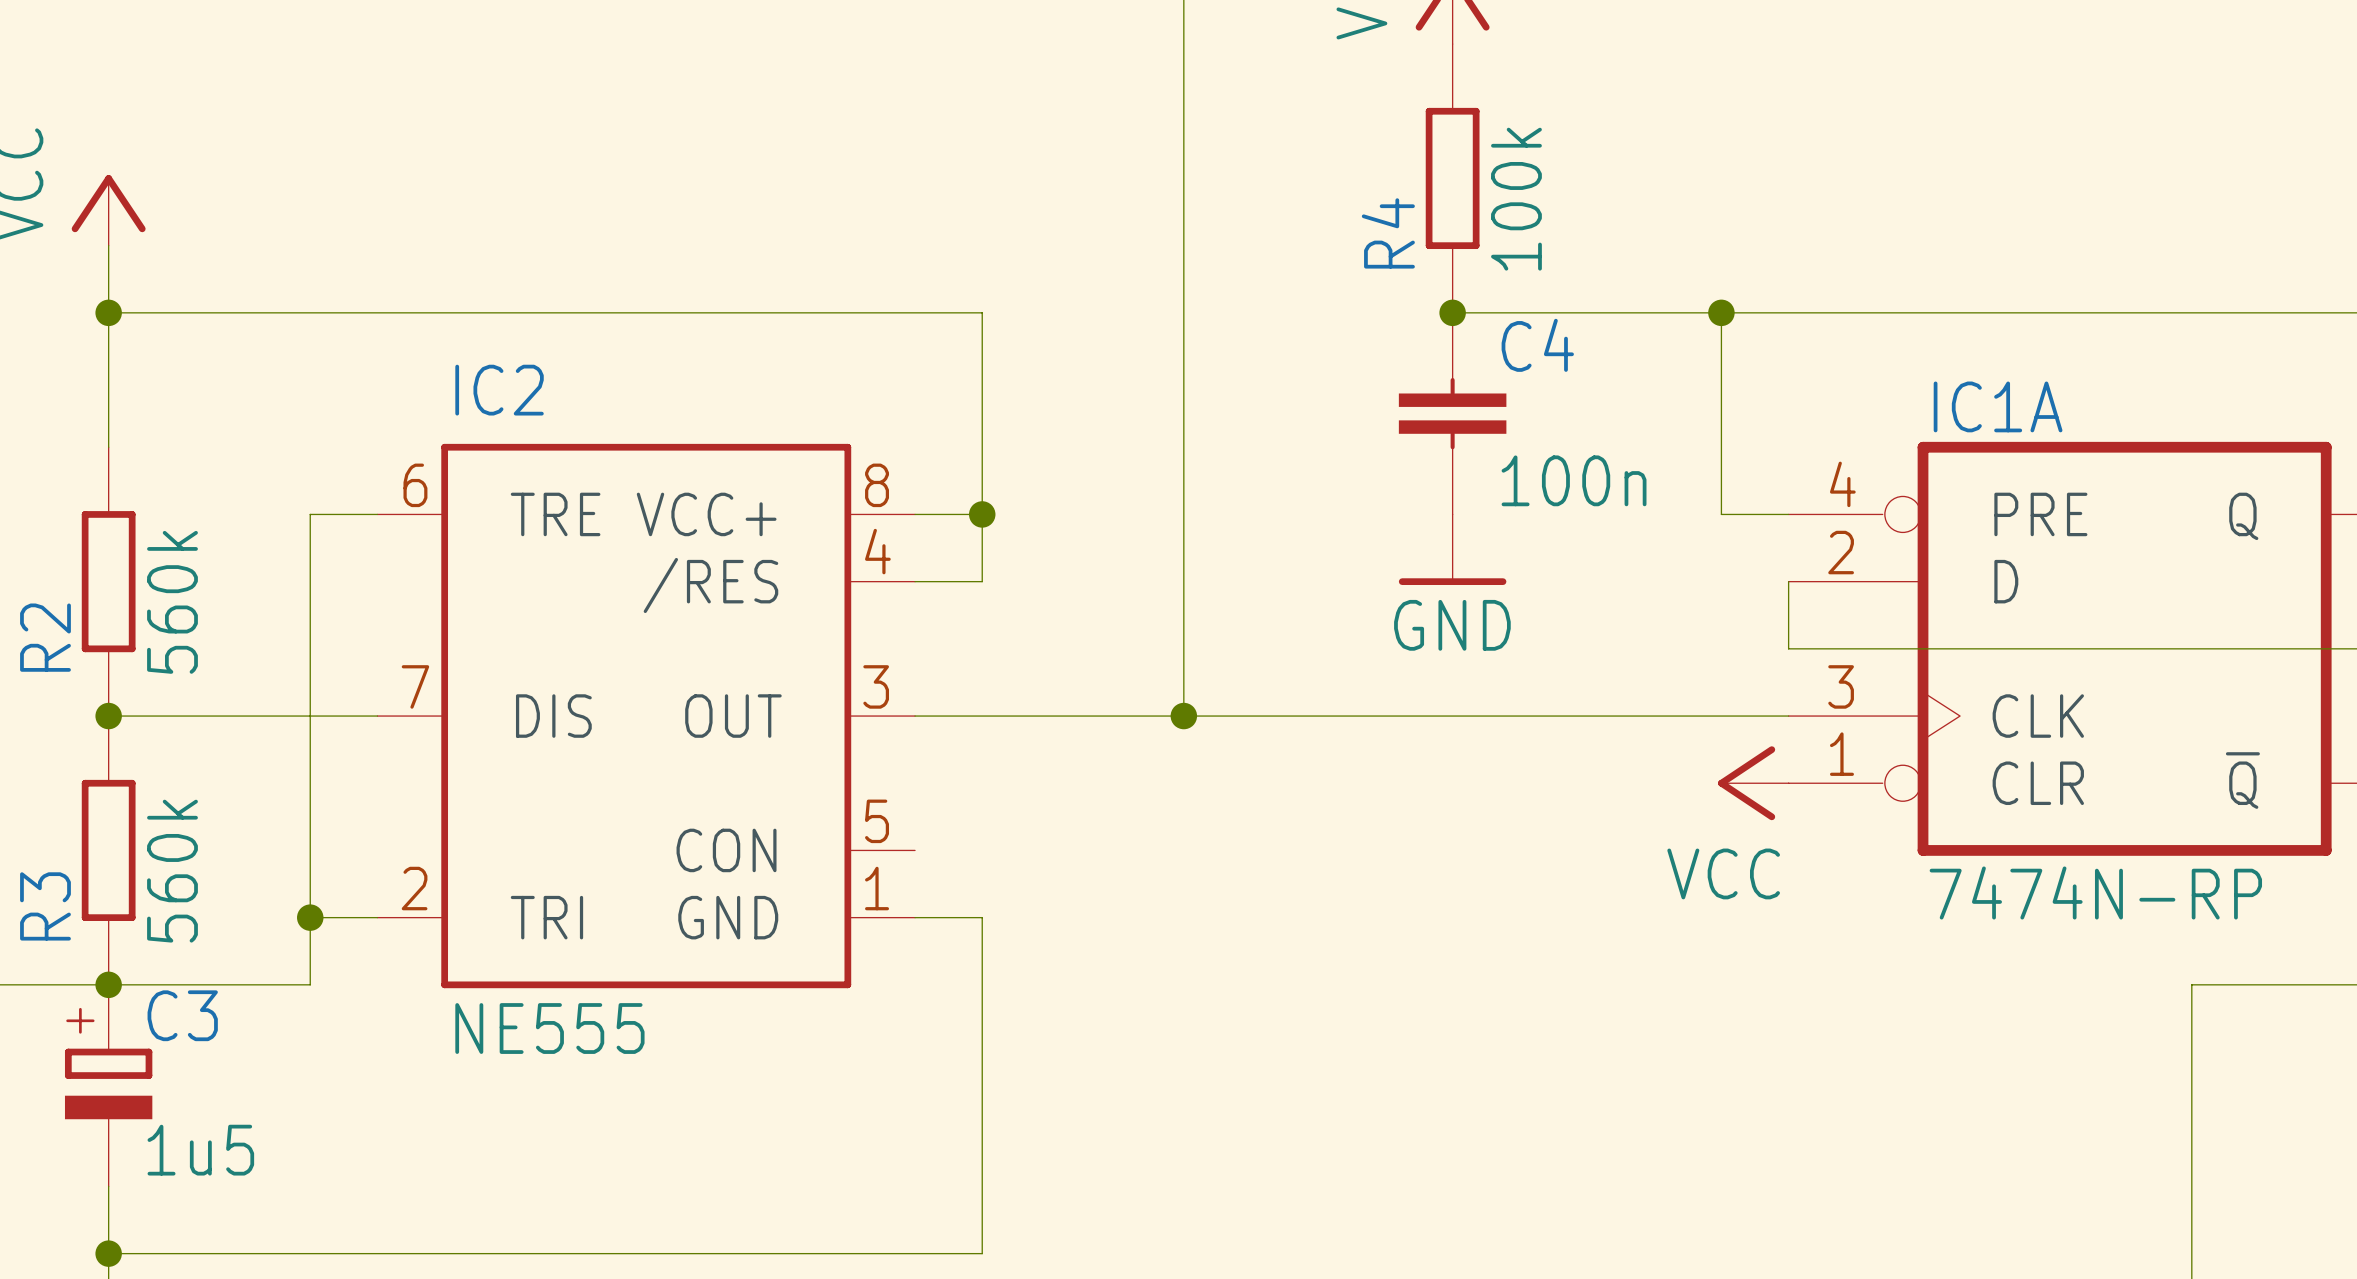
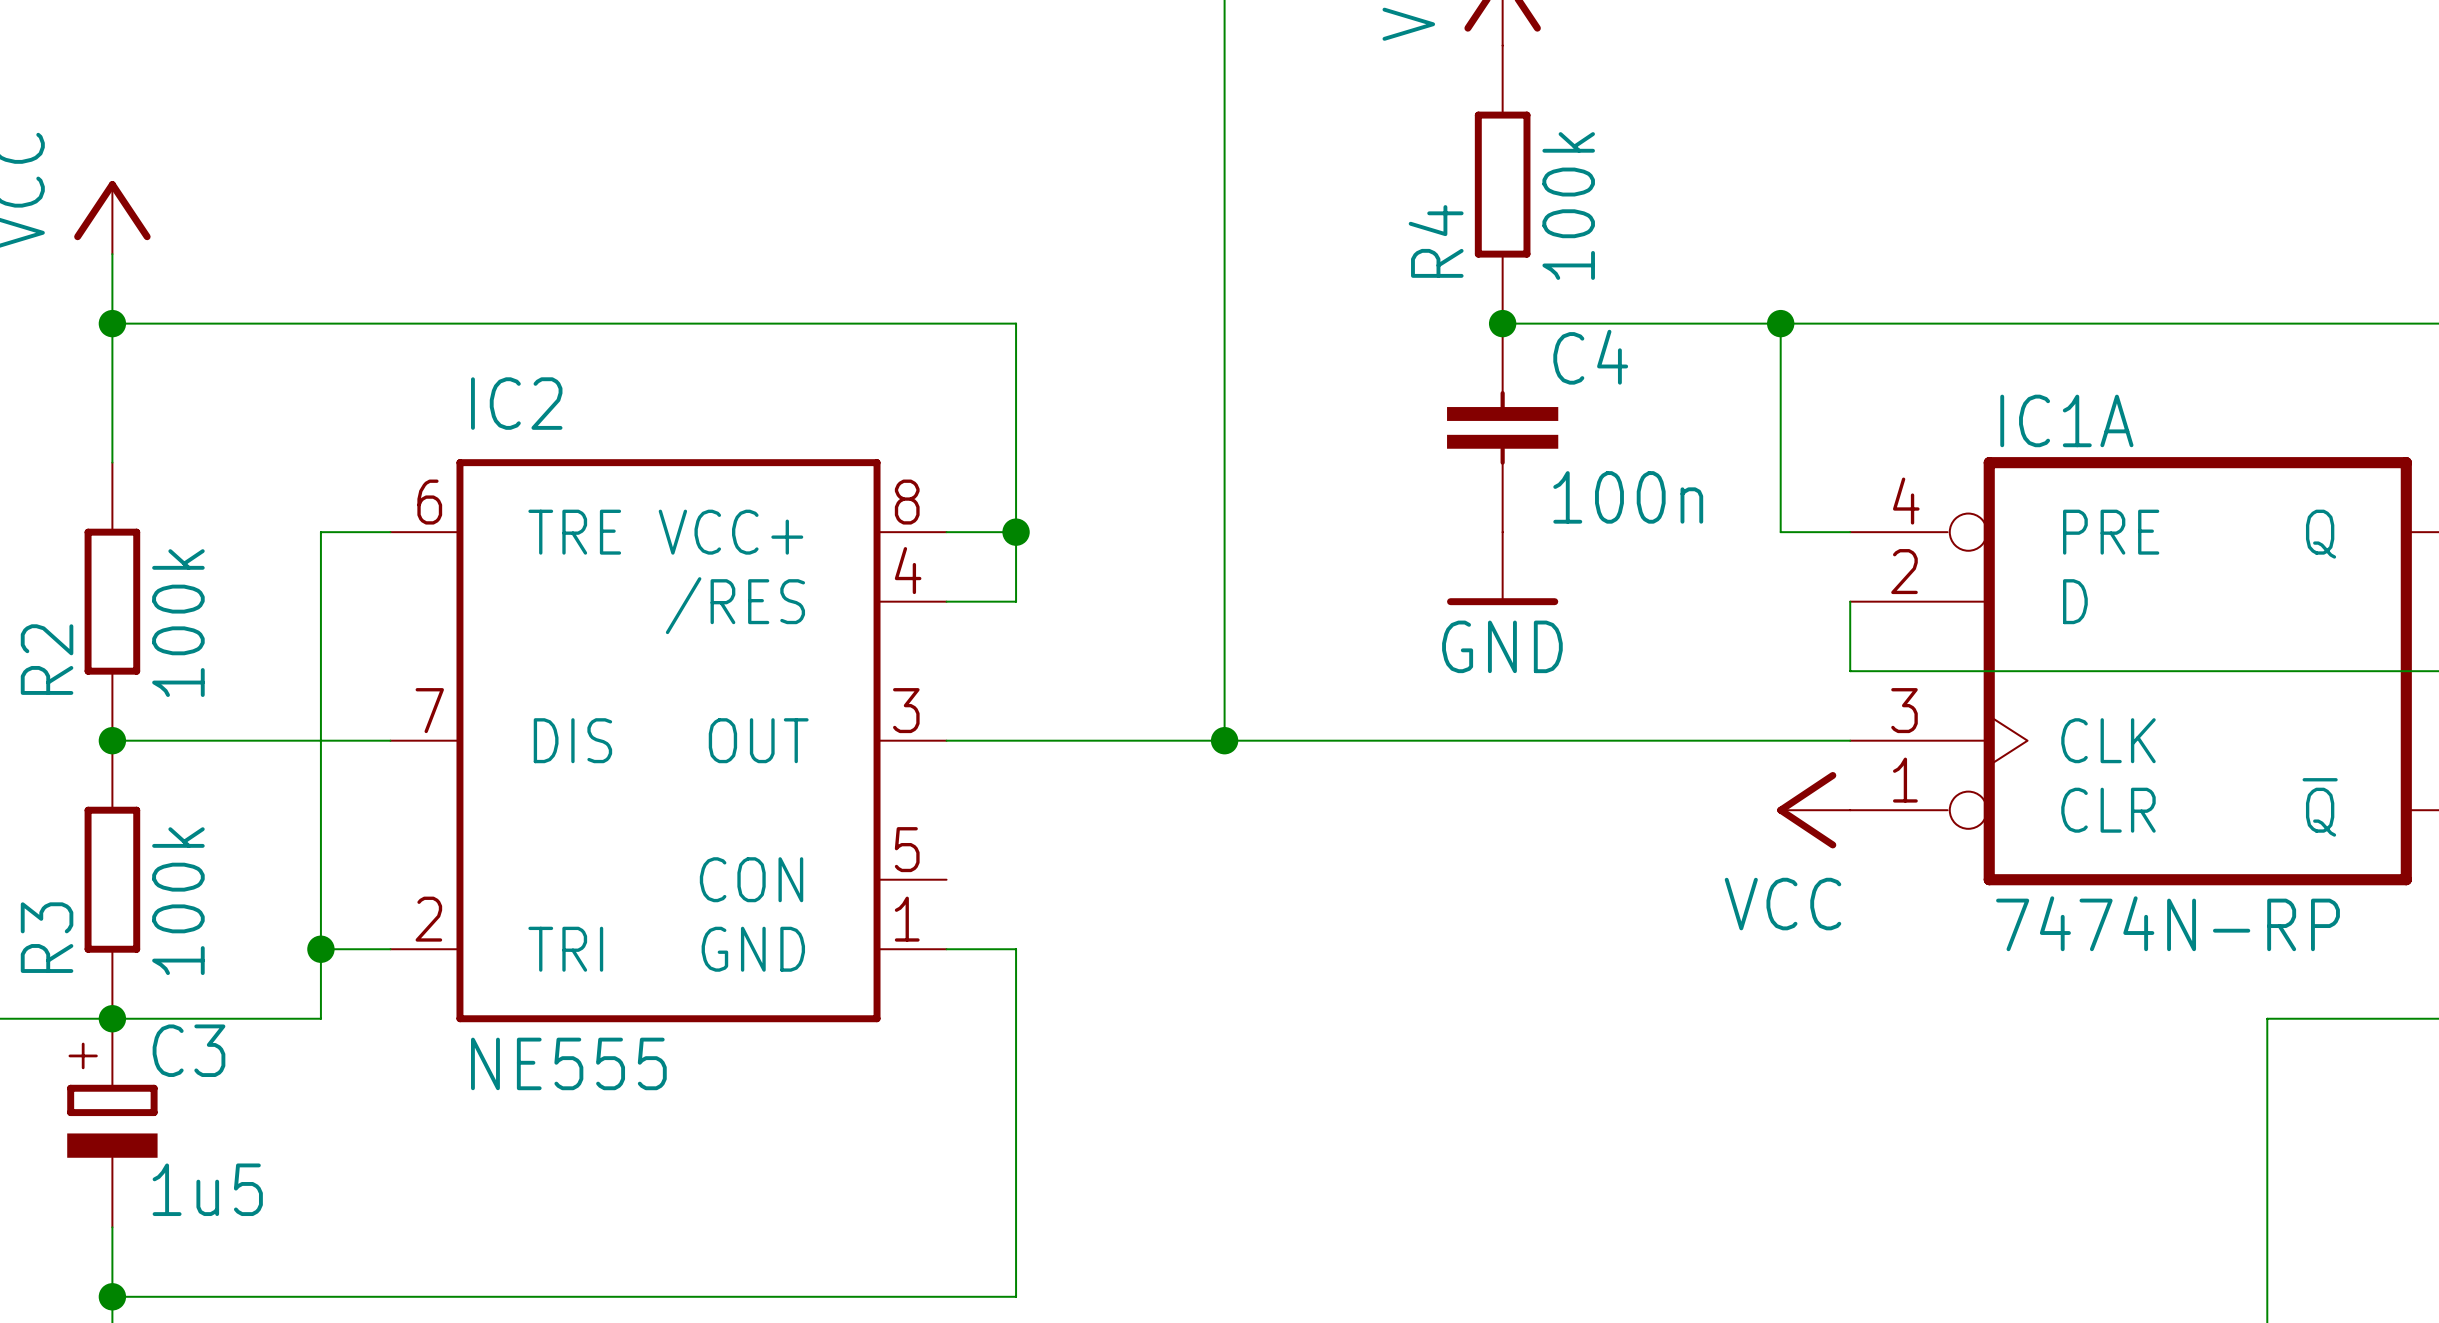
R2 value: 560k (172, 602) -> 100k (178, 623)
R3 value: 560k (172, 871) -> 100k (178, 901)

